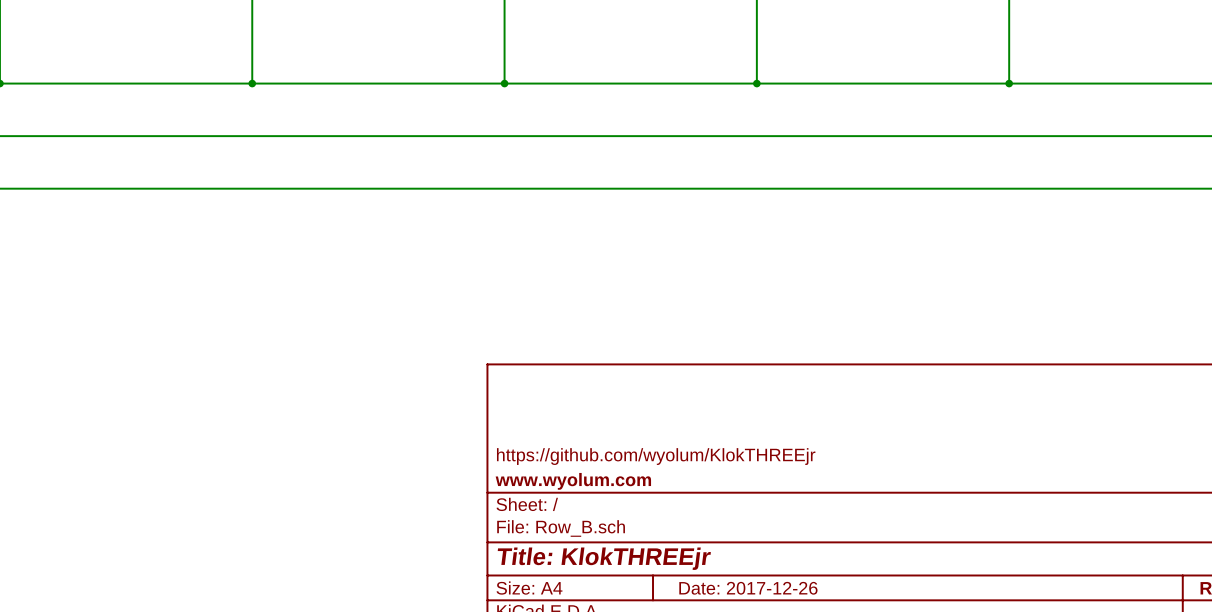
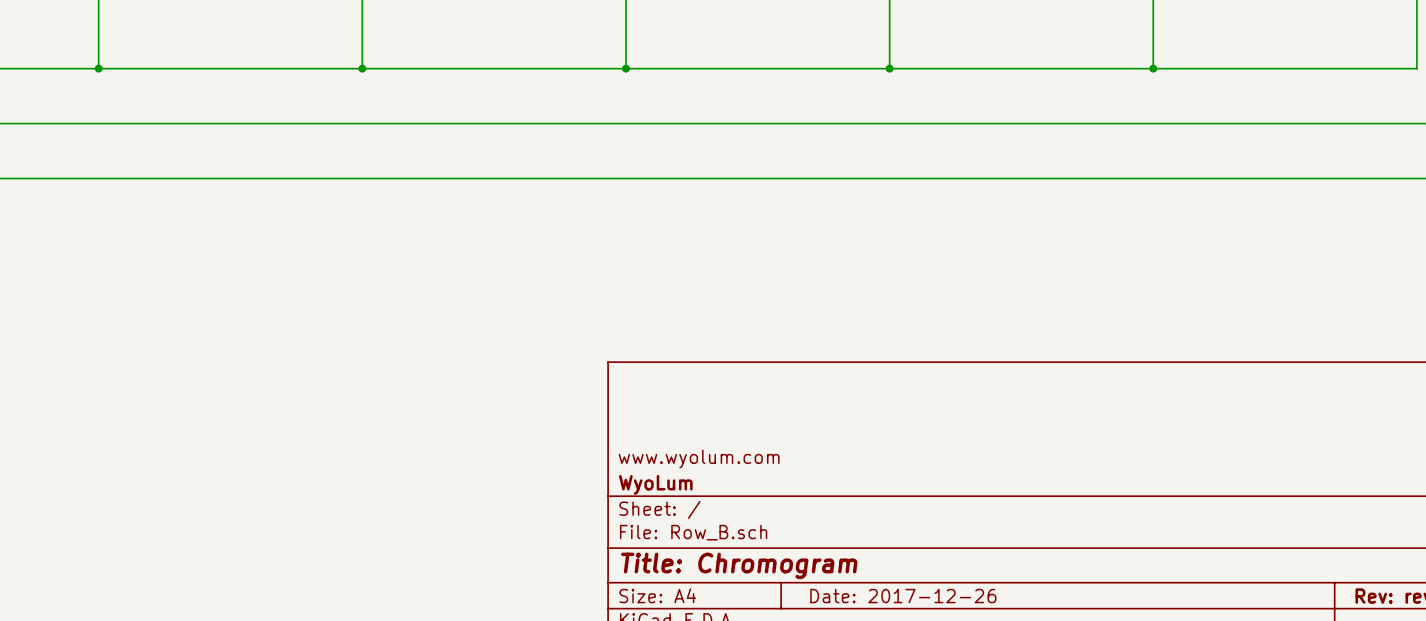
title block: https://github.com/wyolum/KlokTHREEjr (656, 456) -> www.wyolum.com (699, 458)
title block: www.wyolum.com (573, 481) -> WyoLum (655, 484)
title block: Title: KlokTHREEjr (604, 558) -> Title: Chromogram (739, 565)

